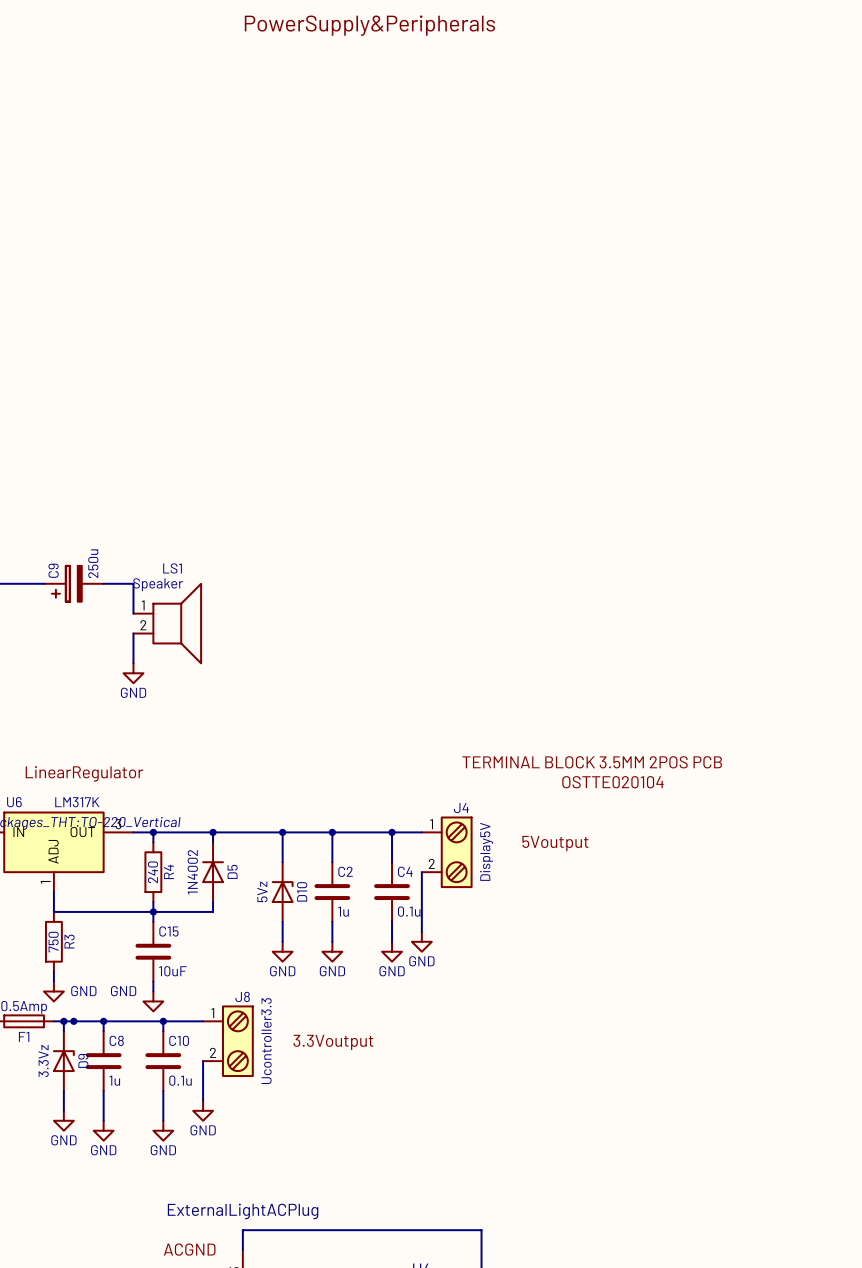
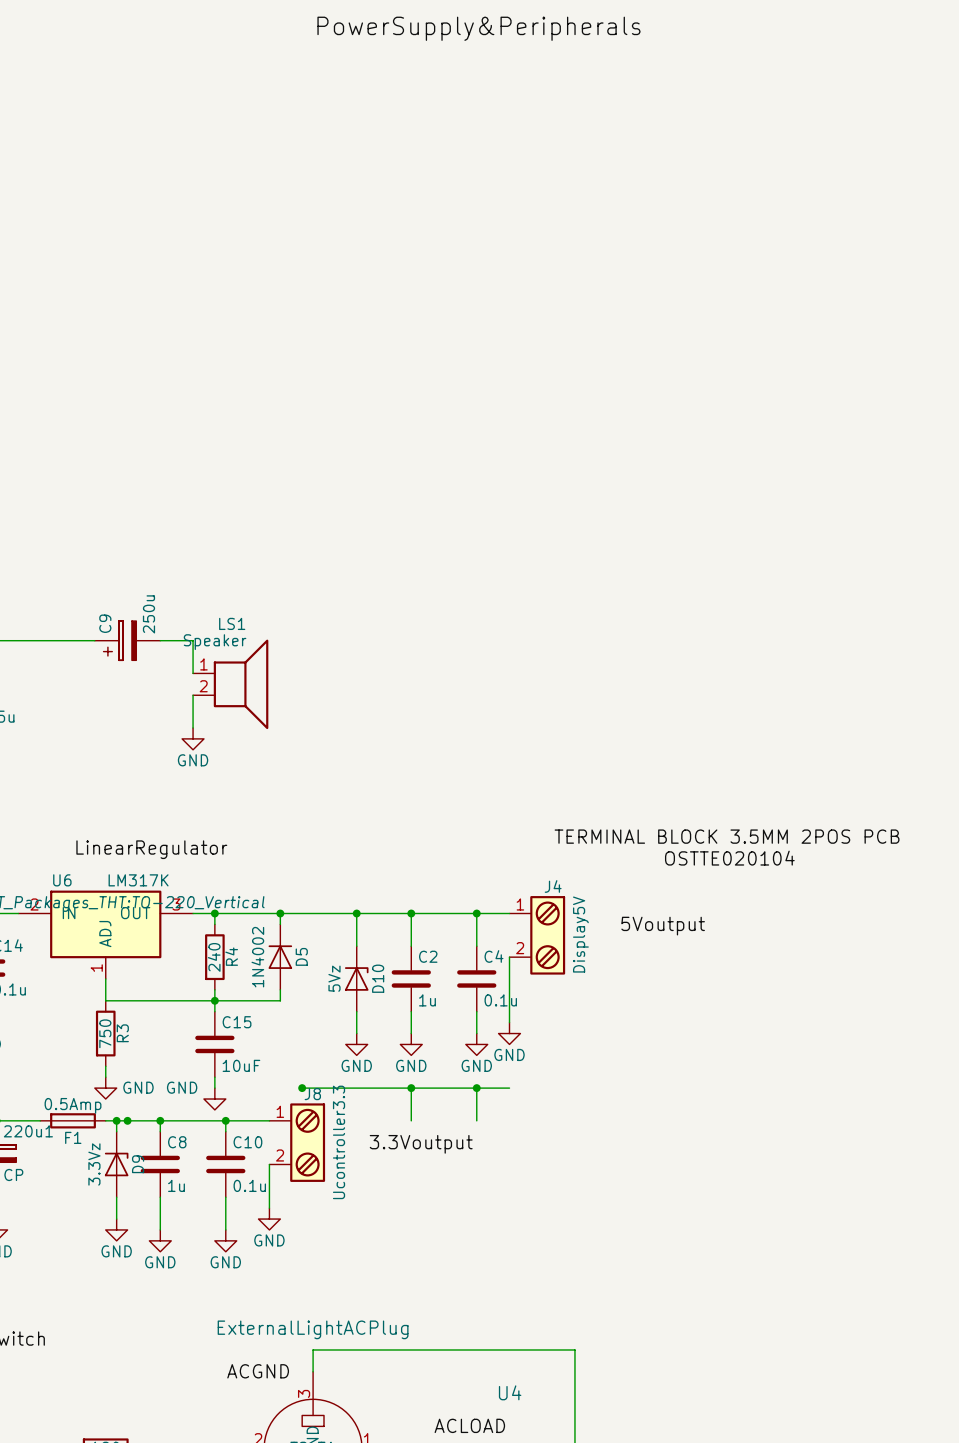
wire: none -> (302, 1088) (509, 1088)
junction: none -> (302, 1088)
wire: none -> (411, 1088) (411, 1120)
junction: none -> (411, 1088)
wire: none -> (476, 1088) (476, 1120)
junction: none -> (476, 1088)

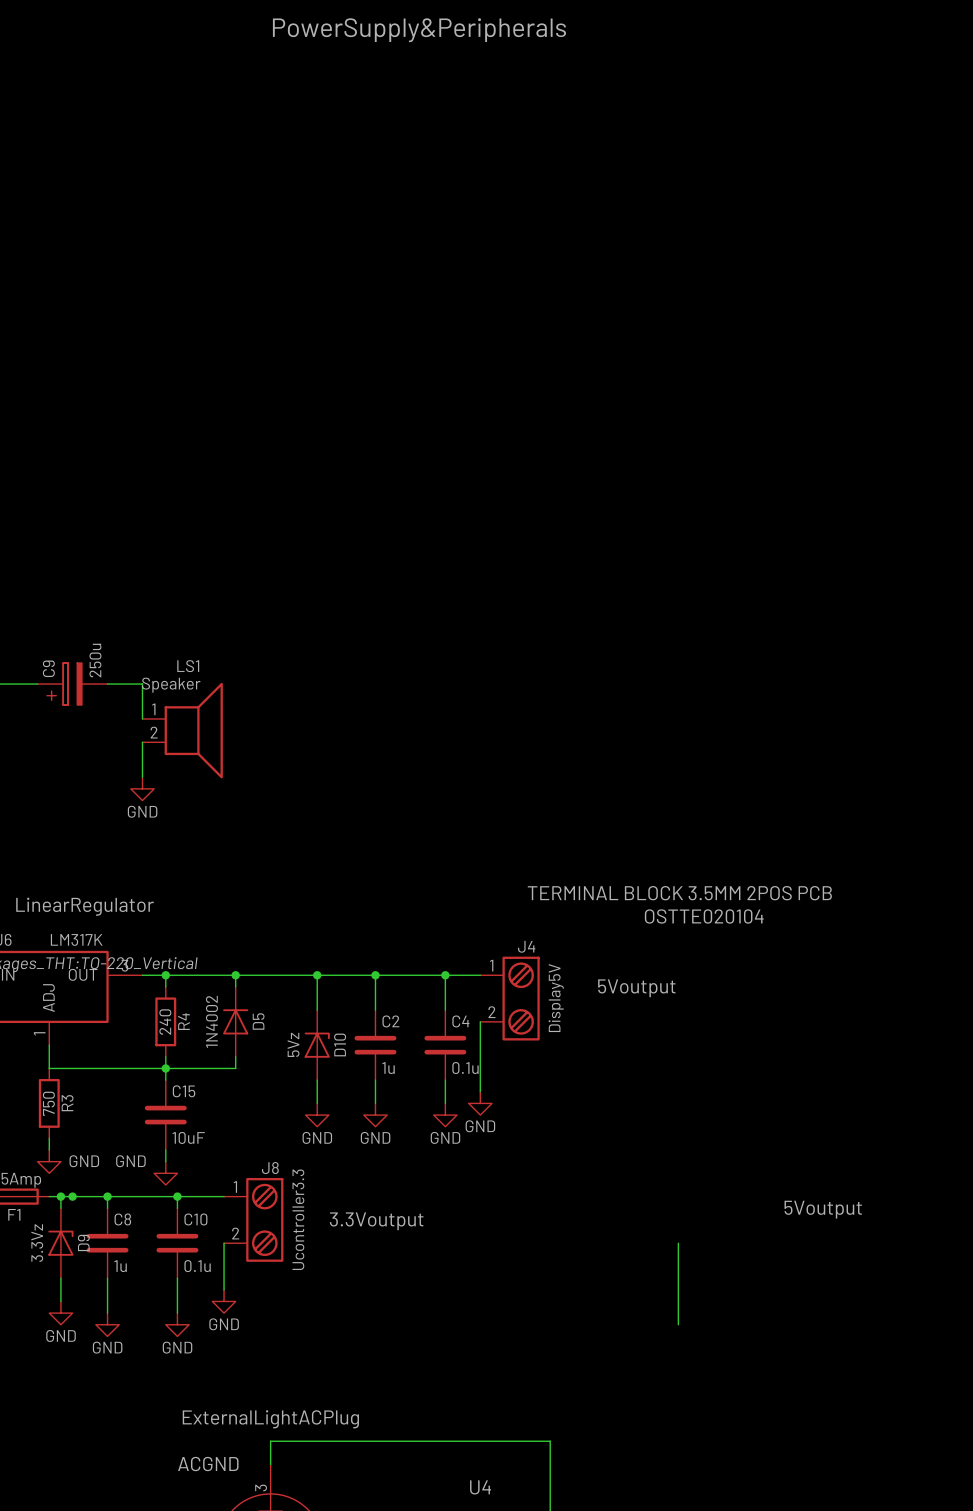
wire: (302, 1088) (509, 1088) -> none
junction: (302, 1088) -> none
wire: (411, 1088) (411, 1120) -> none
junction: (411, 1088) -> none
wire: (476, 1088) (476, 1120) -> none
junction: (476, 1088) -> none
label: none -> 5Voutput (823, 1209)
wire: none -> (678, 1243) (678, 1324)

